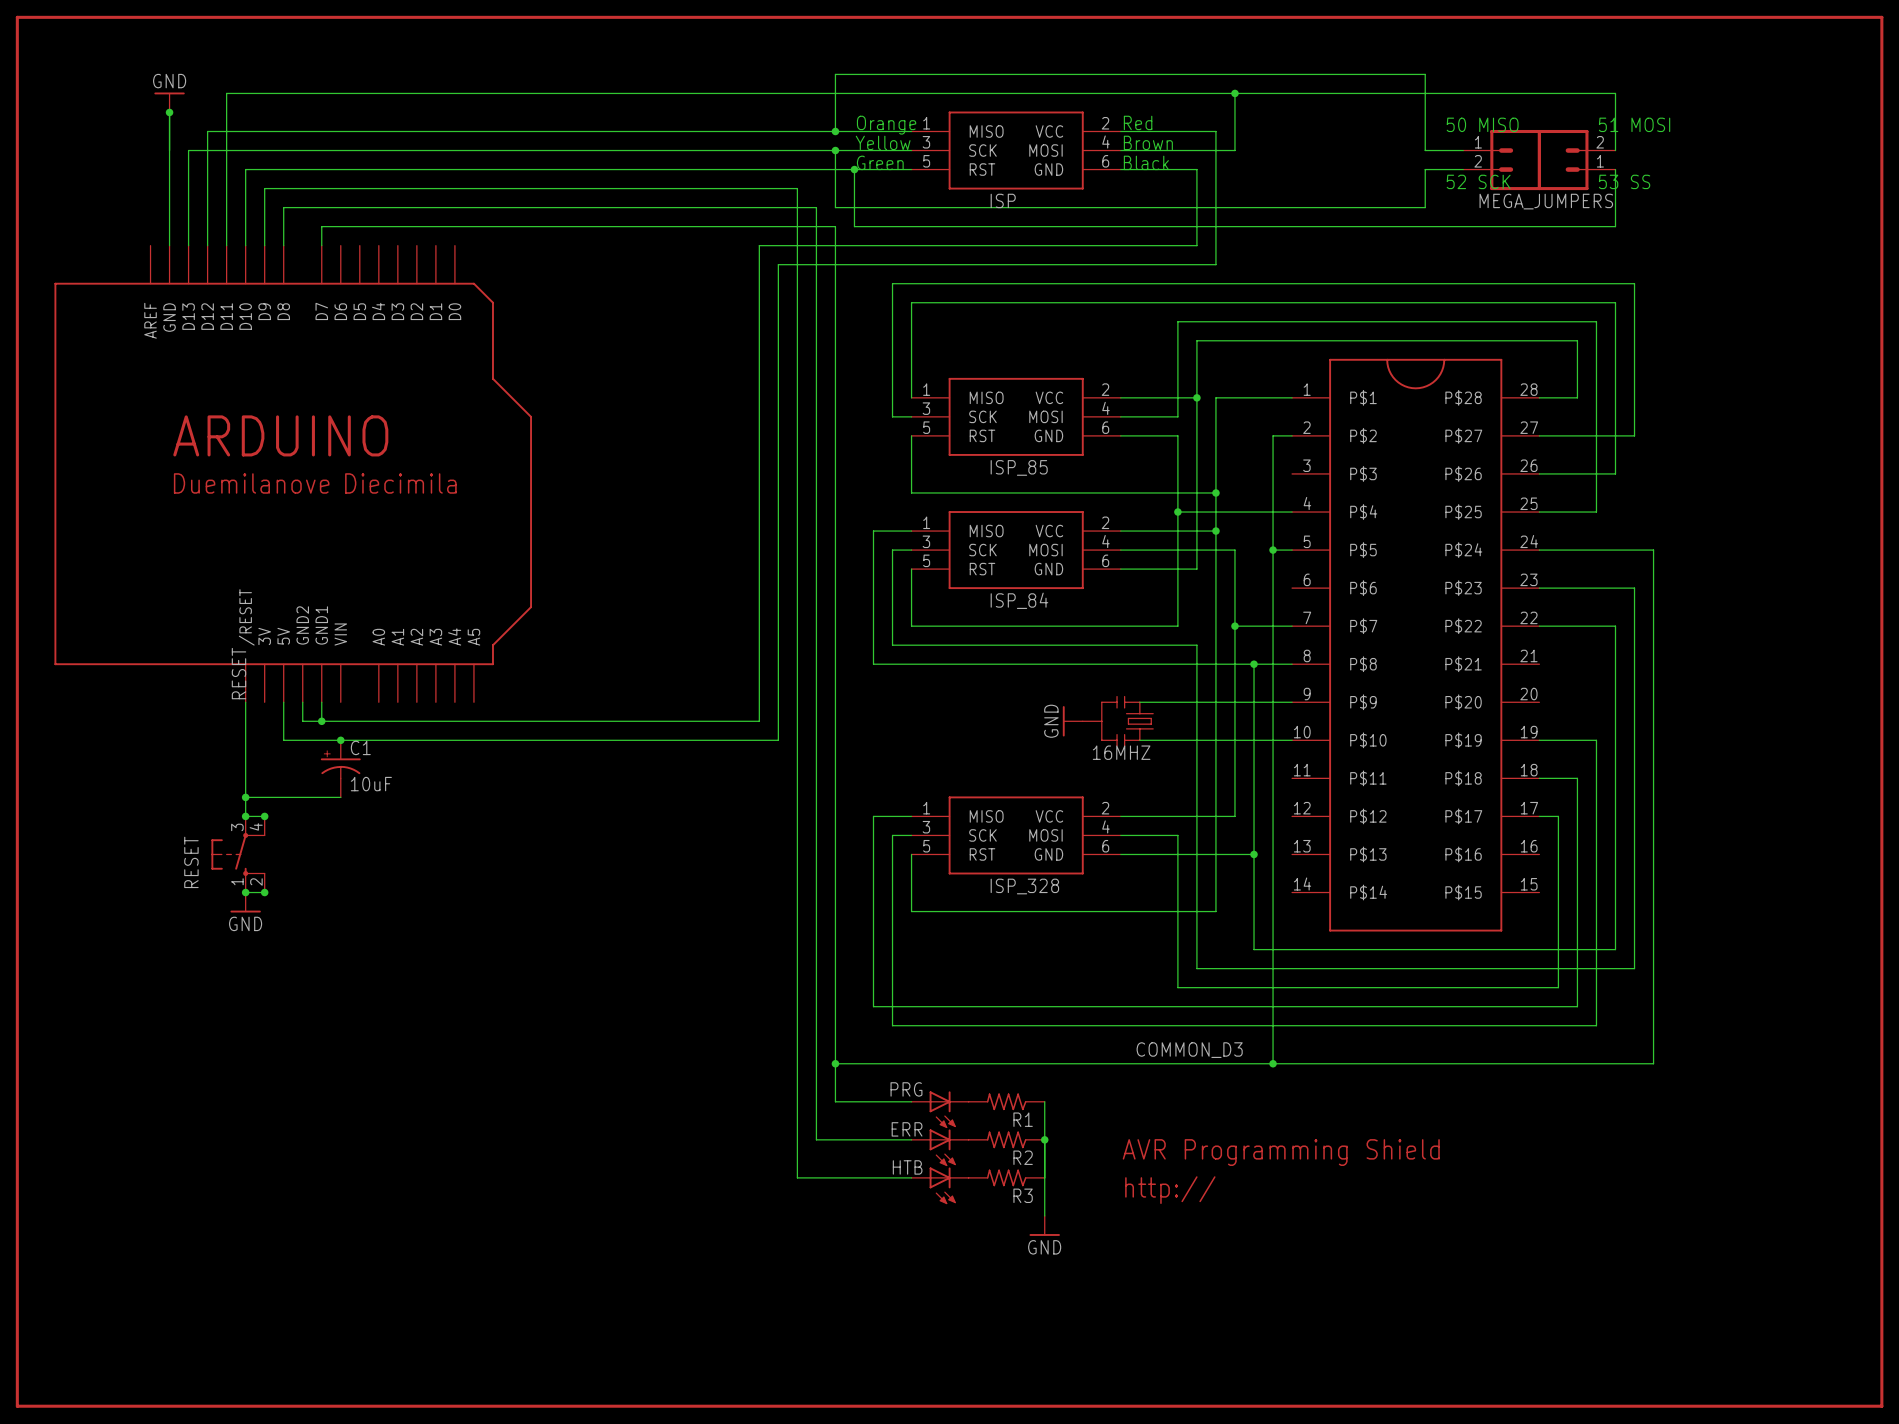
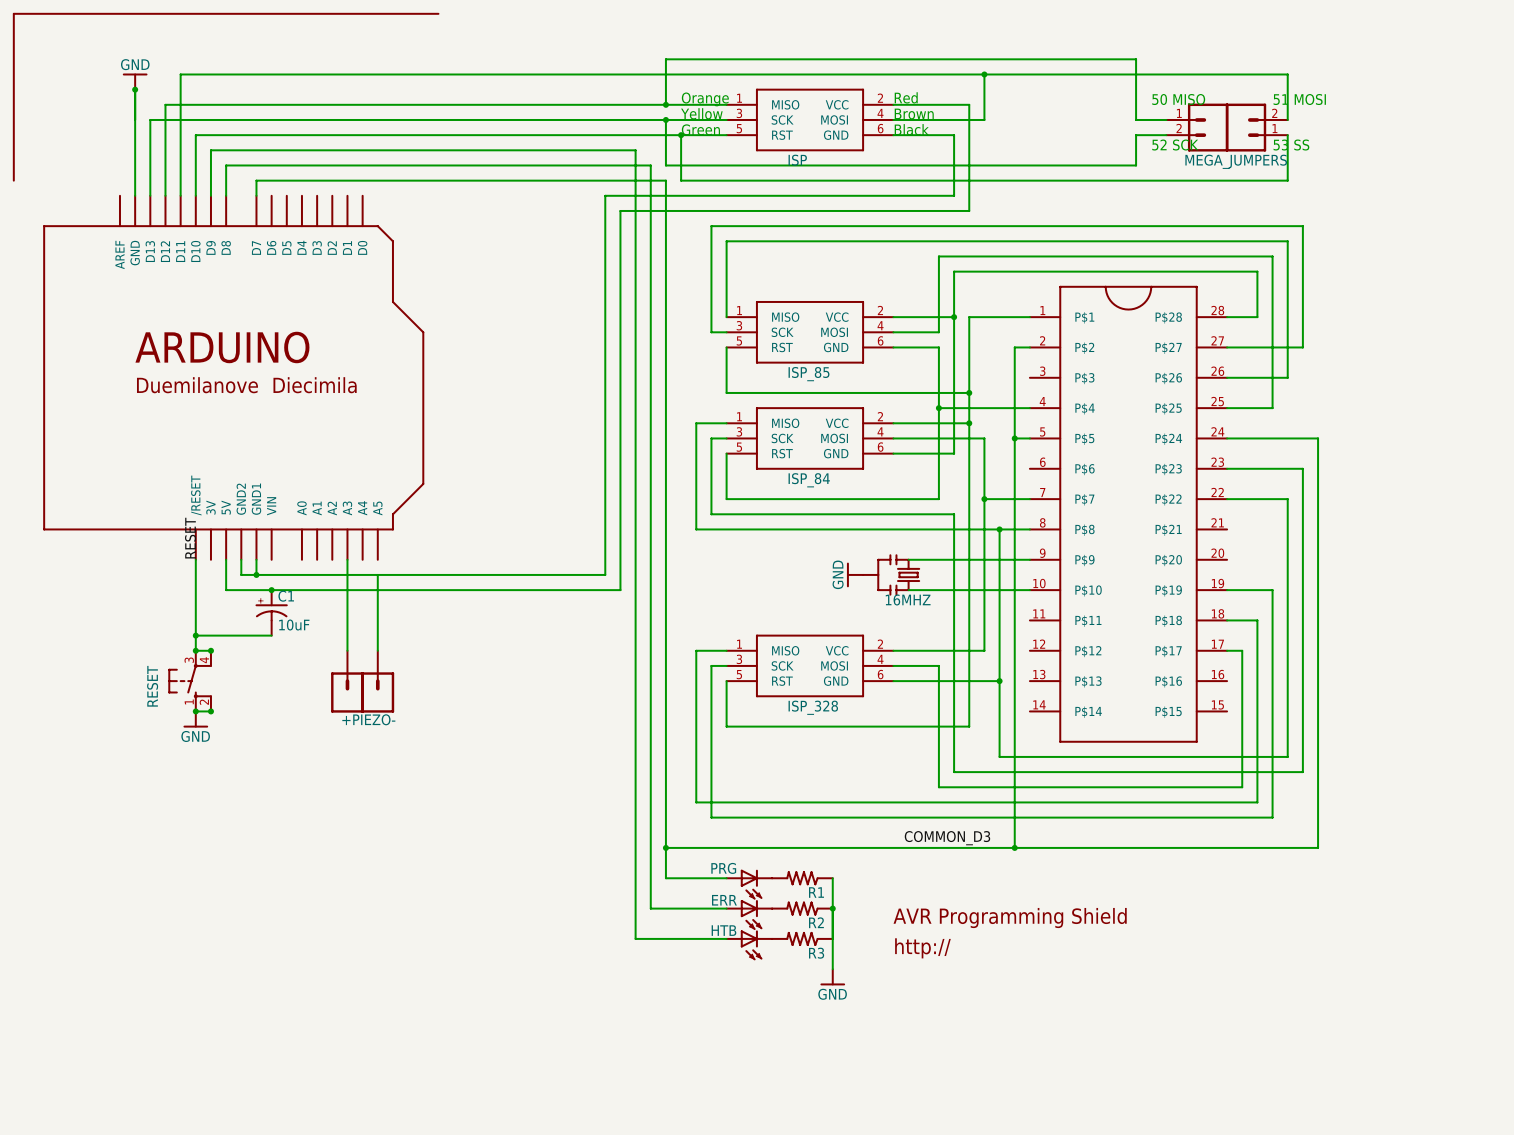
wire: none -> (347, 559) (347, 650)
part: (949, 711) -> none
wire: none -> (377, 574) (377, 650)
16MHZ name position: 16MHZ (1121, 752) -> 16MHZ (908, 599)
part: none -> (347, 681)
+PIEZO-: none -> (377, 681)

